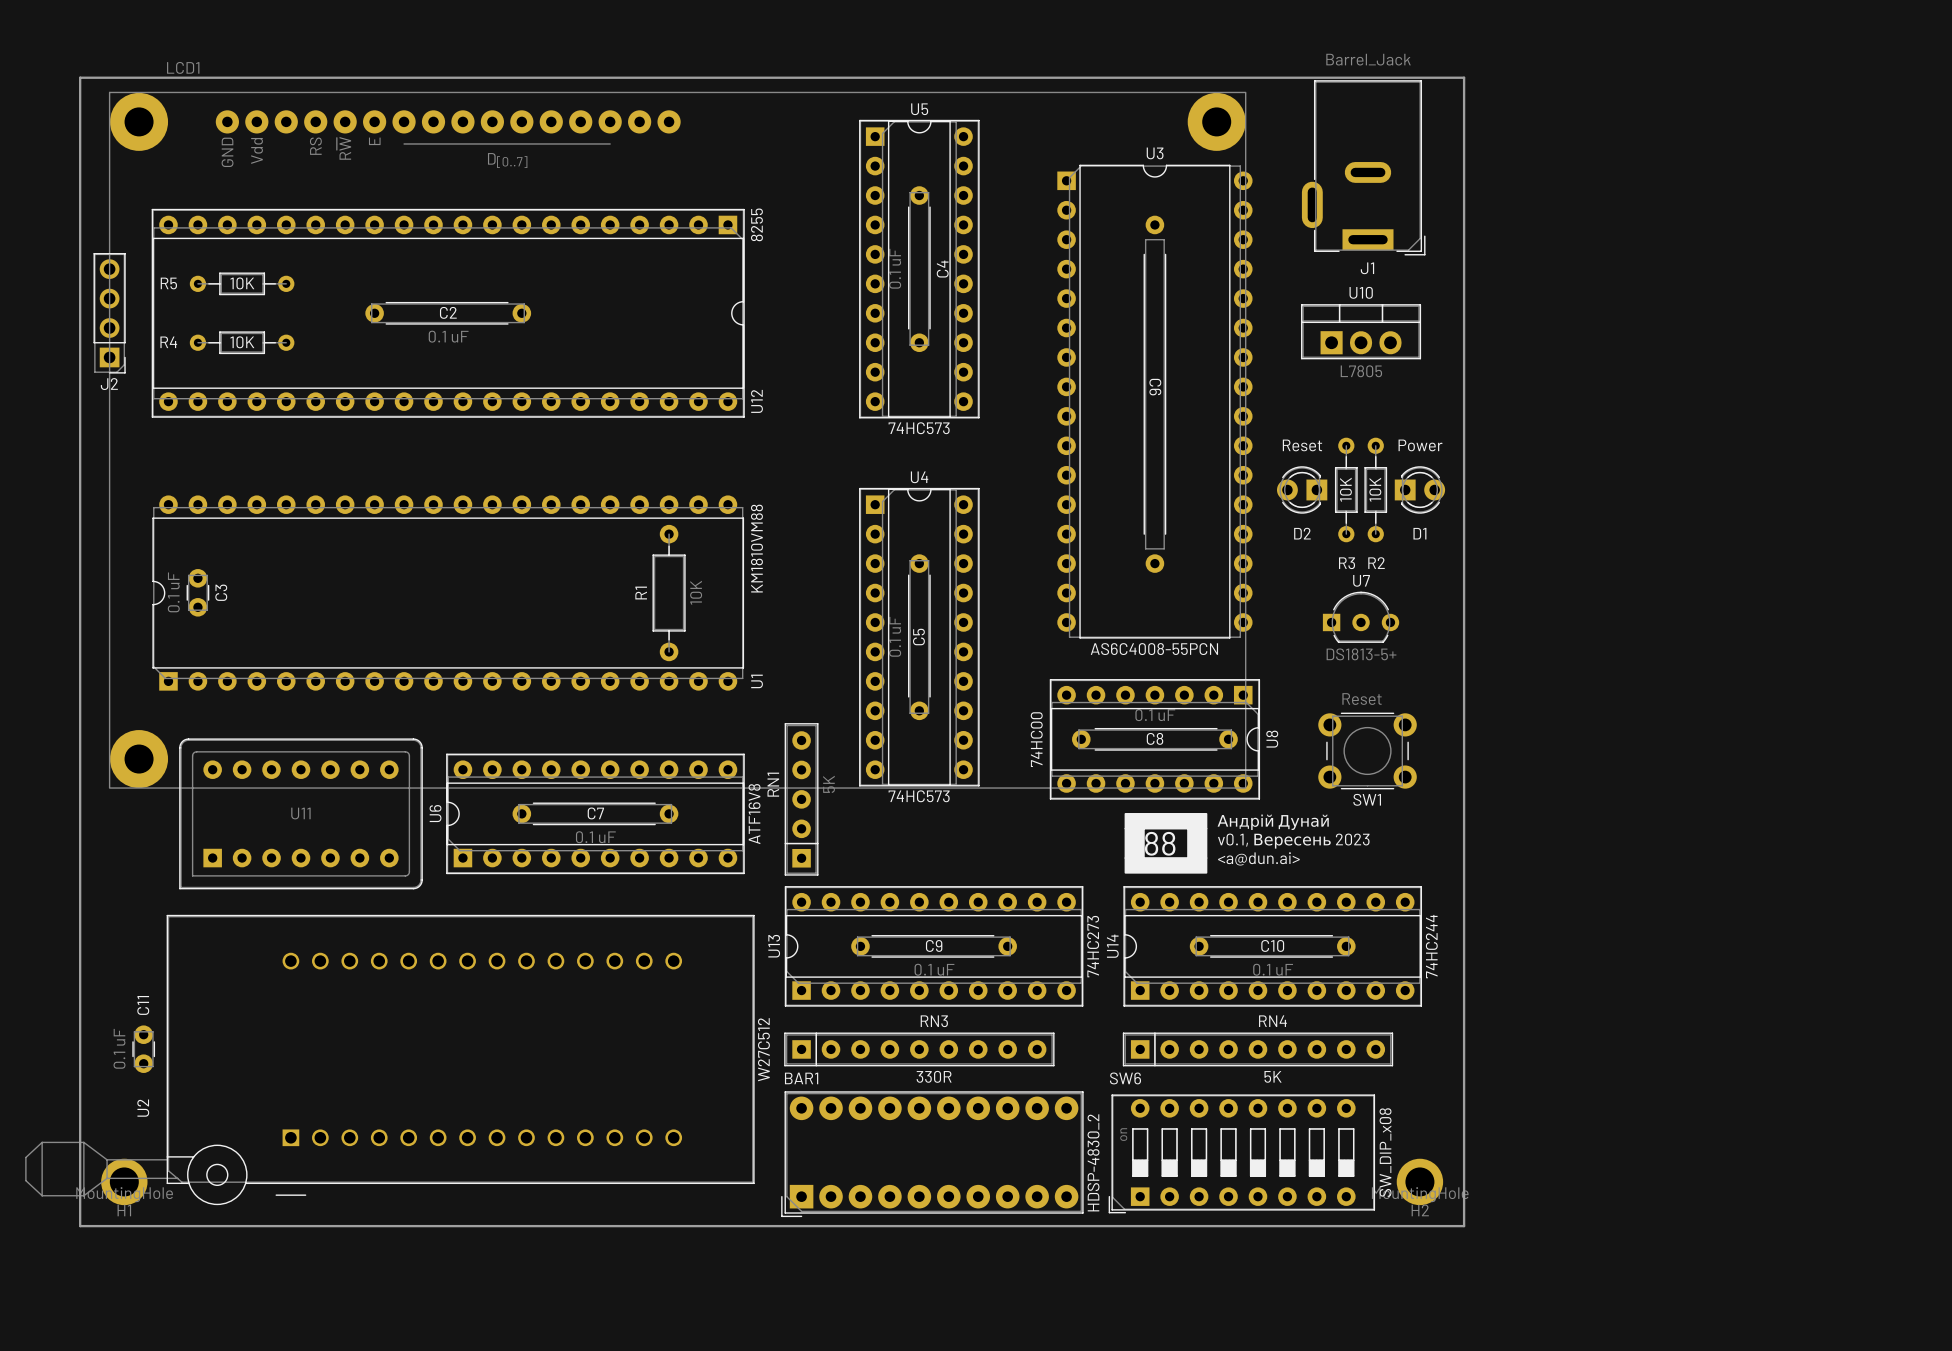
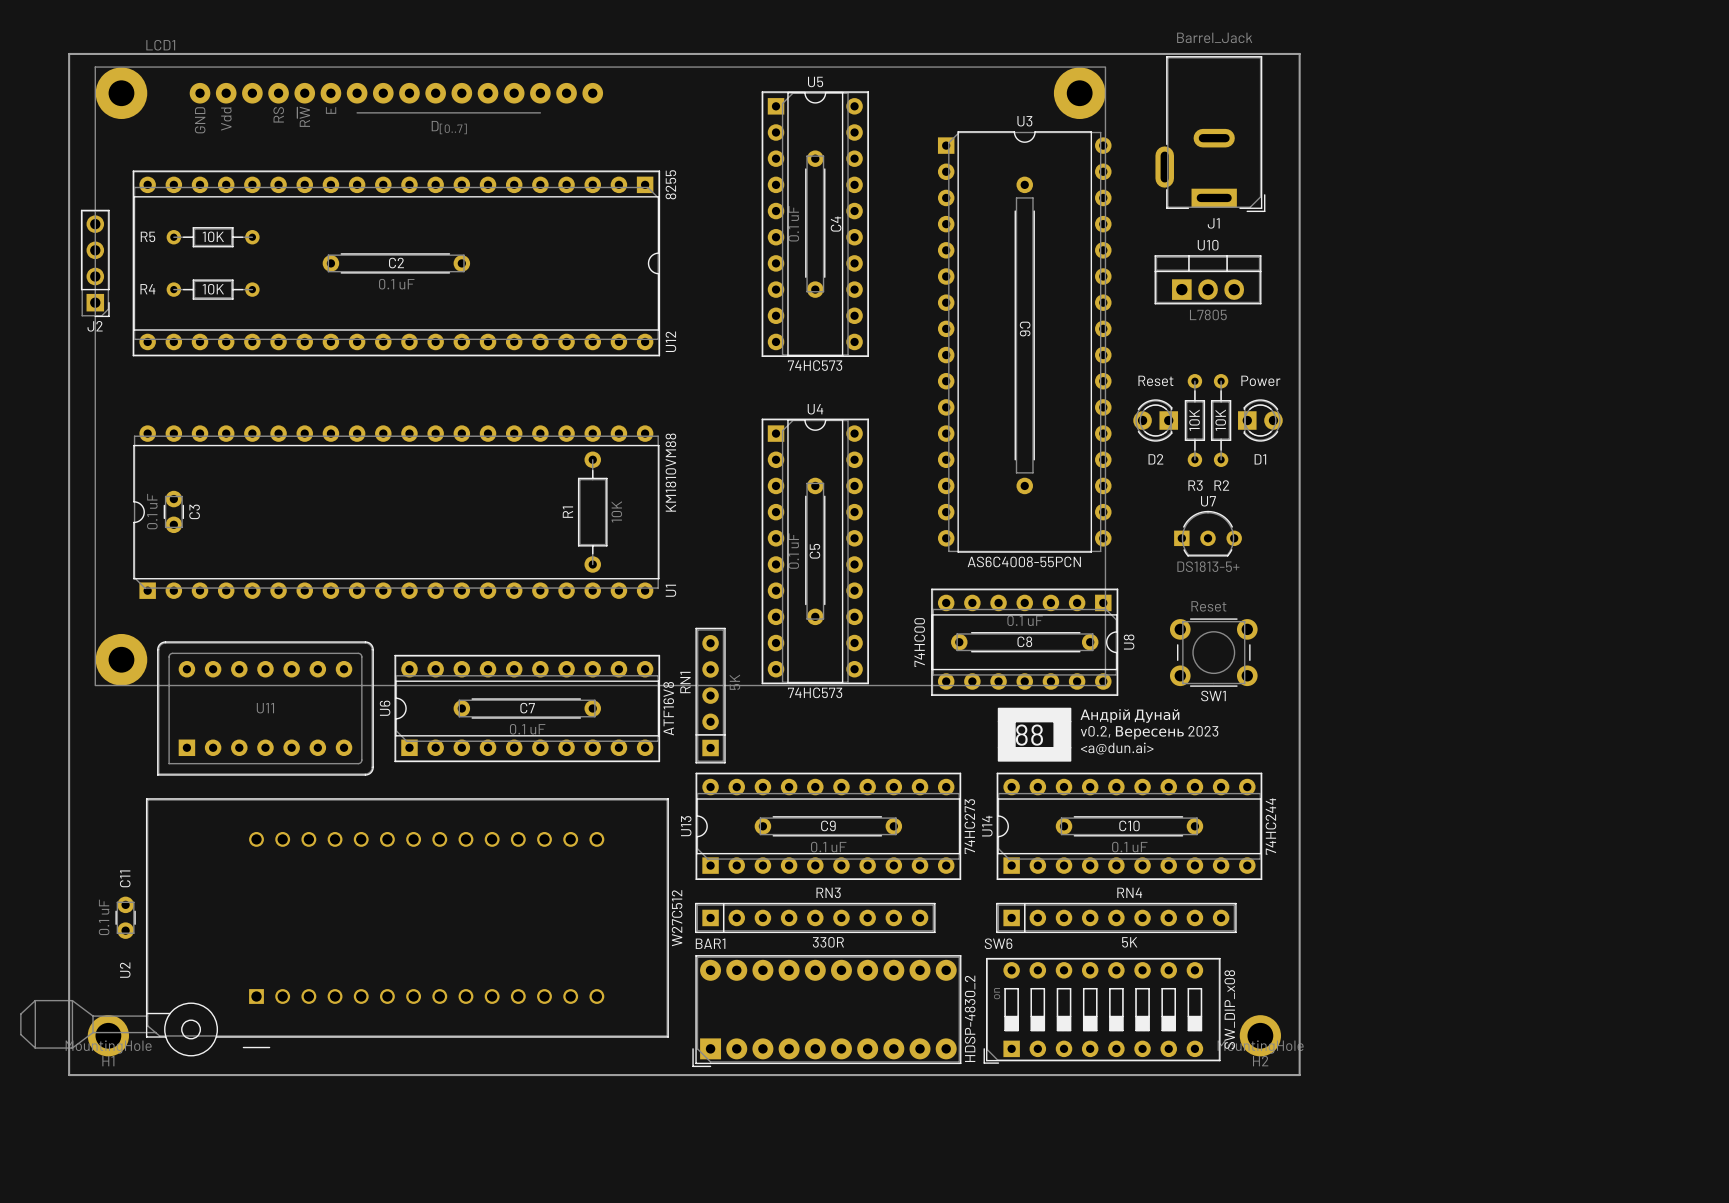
text: v0.1, Вересень 2023 (1293, 841) -> v0.2, Вересень 2023 (1149, 732)

